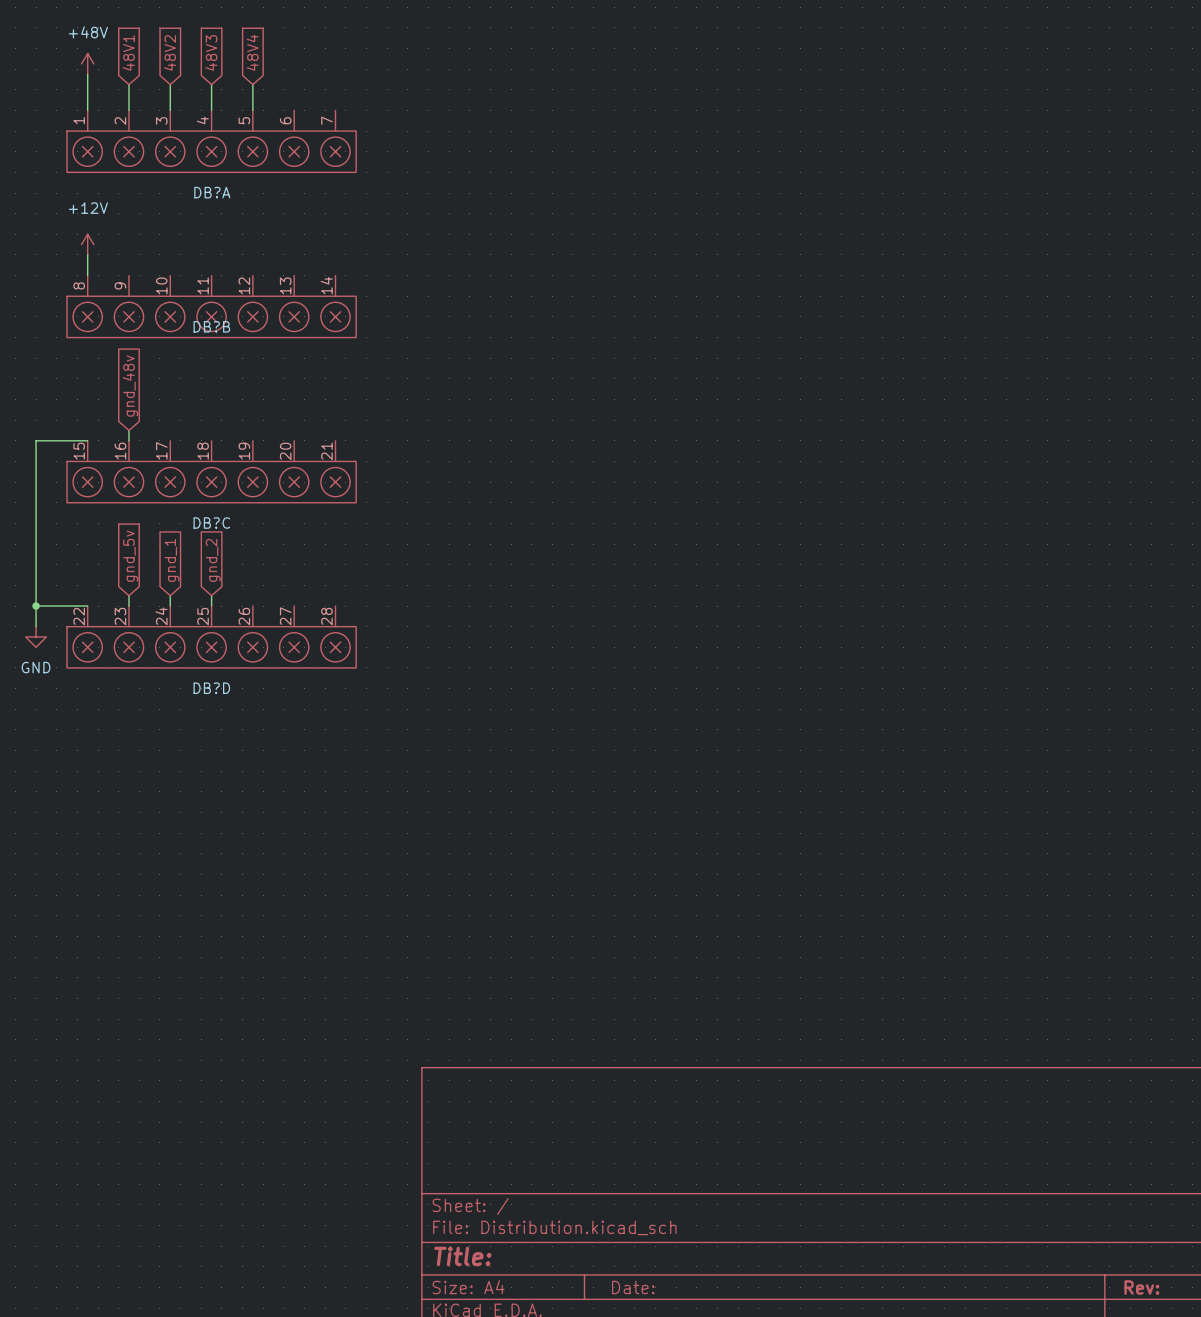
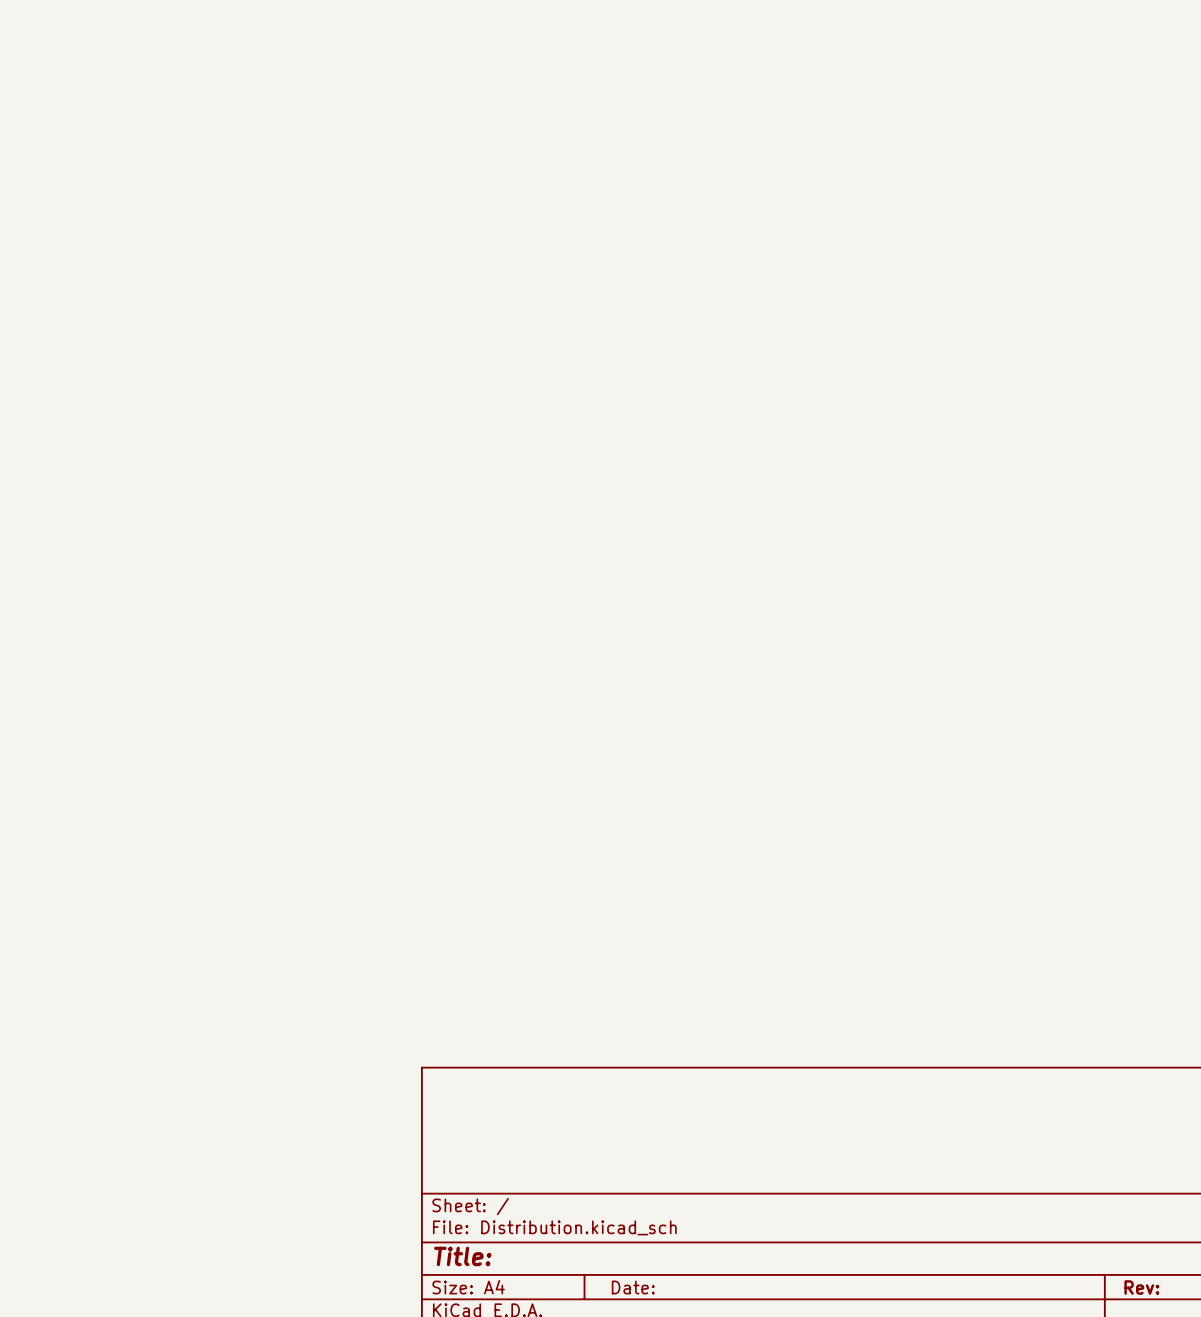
global label: 48V1 (128, 52) -> none
global label: 48V2 (170, 52) -> none
global label: 48V3 (211, 52) -> none
global label: 48V4 (252, 52) -> none
power symbol: +48V (87, 63) -> none
wire: (87, 74) (87, 110) -> none
wire: (128, 84) (128, 110) -> none
wire: (170, 84) (170, 110) -> none
wire: (211, 84) (211, 110) -> none
wire: (252, 84) (252, 110) -> none
DB?A: (211, 141) -> none
power symbol: +12V (87, 244) -> none
wire: (87, 254) (87, 275) -> none
DB?B: (211, 306) -> none
global label: gnd_48v (130, 386) -> none
wire: (128, 430) (128, 440) -> none
wire: (87, 440) (36, 440) (36, 626) -> none
DB?C: (211, 471) -> none
global label: gnd_5v (130, 556) -> none
global label: gnd_1 (172, 560) -> none
global label: gnd_2 (213, 560) -> none
wire: (128, 595) (128, 606) -> none
wire: (170, 595) (170, 606) -> none
wire: (211, 595) (211, 606) -> none
wire: (36, 606) (87, 606) -> none
junction: (36, 606) -> none
power symbol: GND (36, 636) -> none
DB?D: (211, 636) -> none

